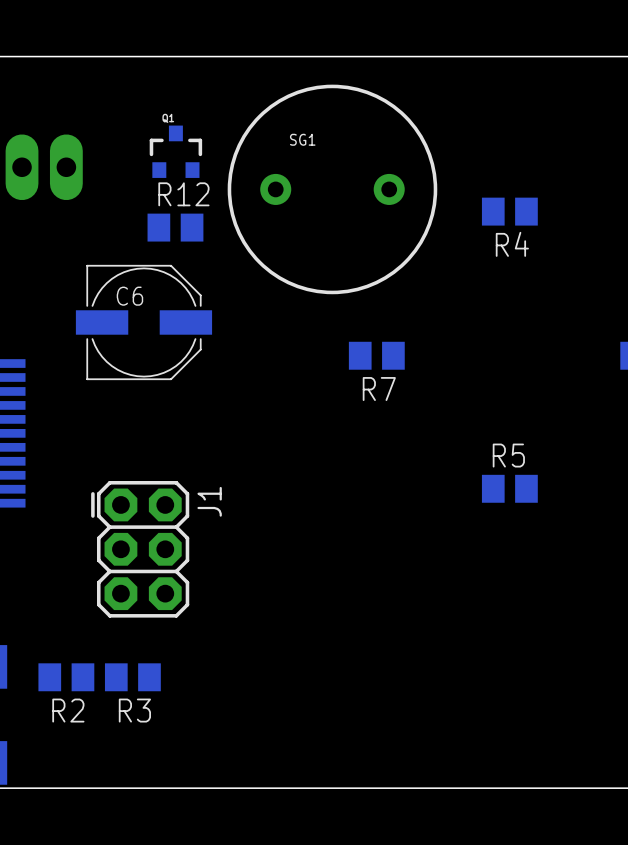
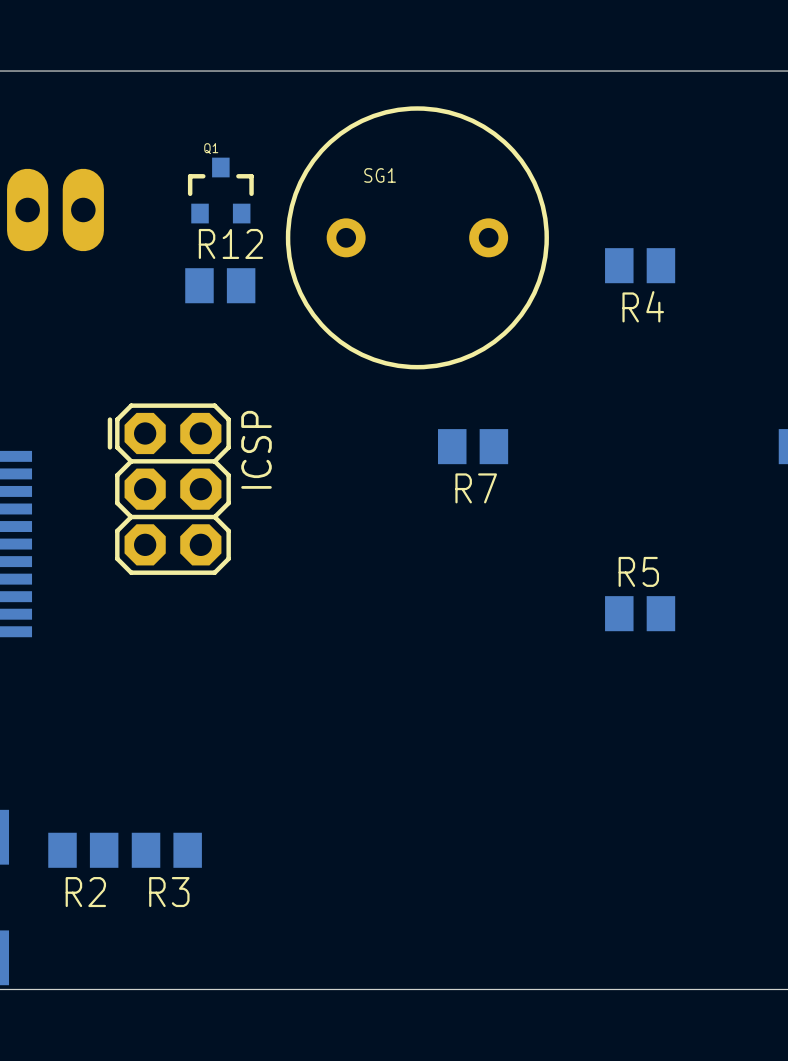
C6: (143, 322) -> none
ICSP: none -> (169, 489)
J1: (140, 549) -> none

